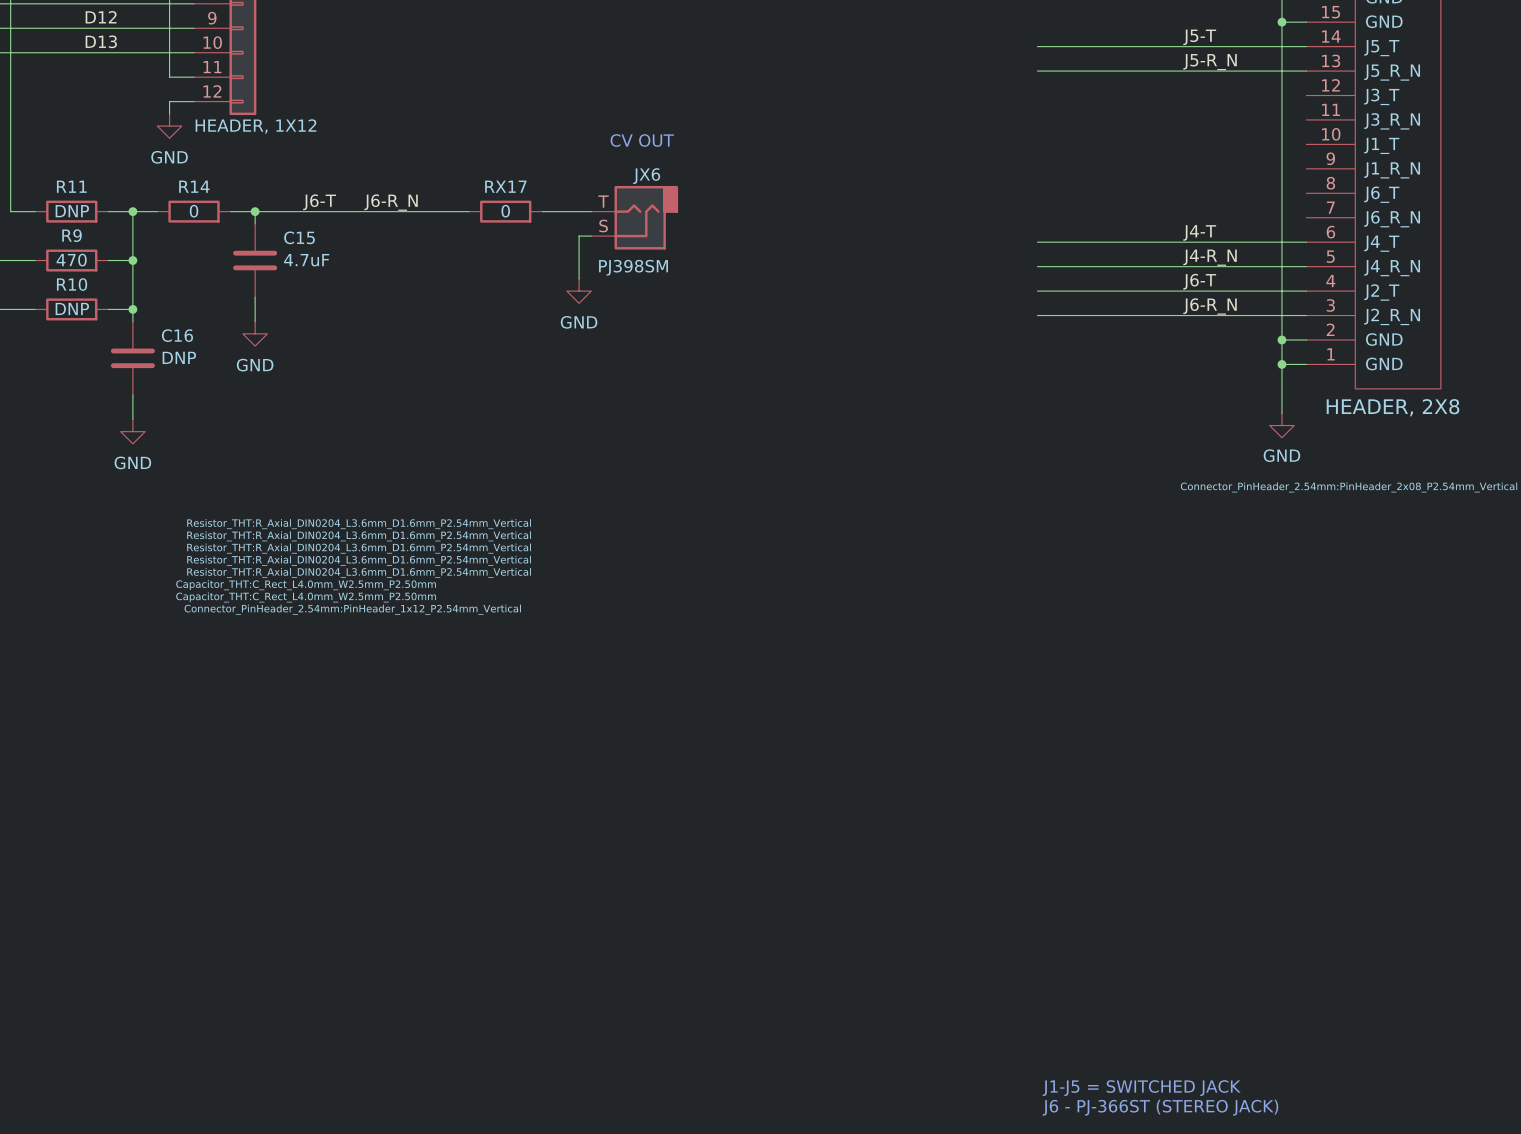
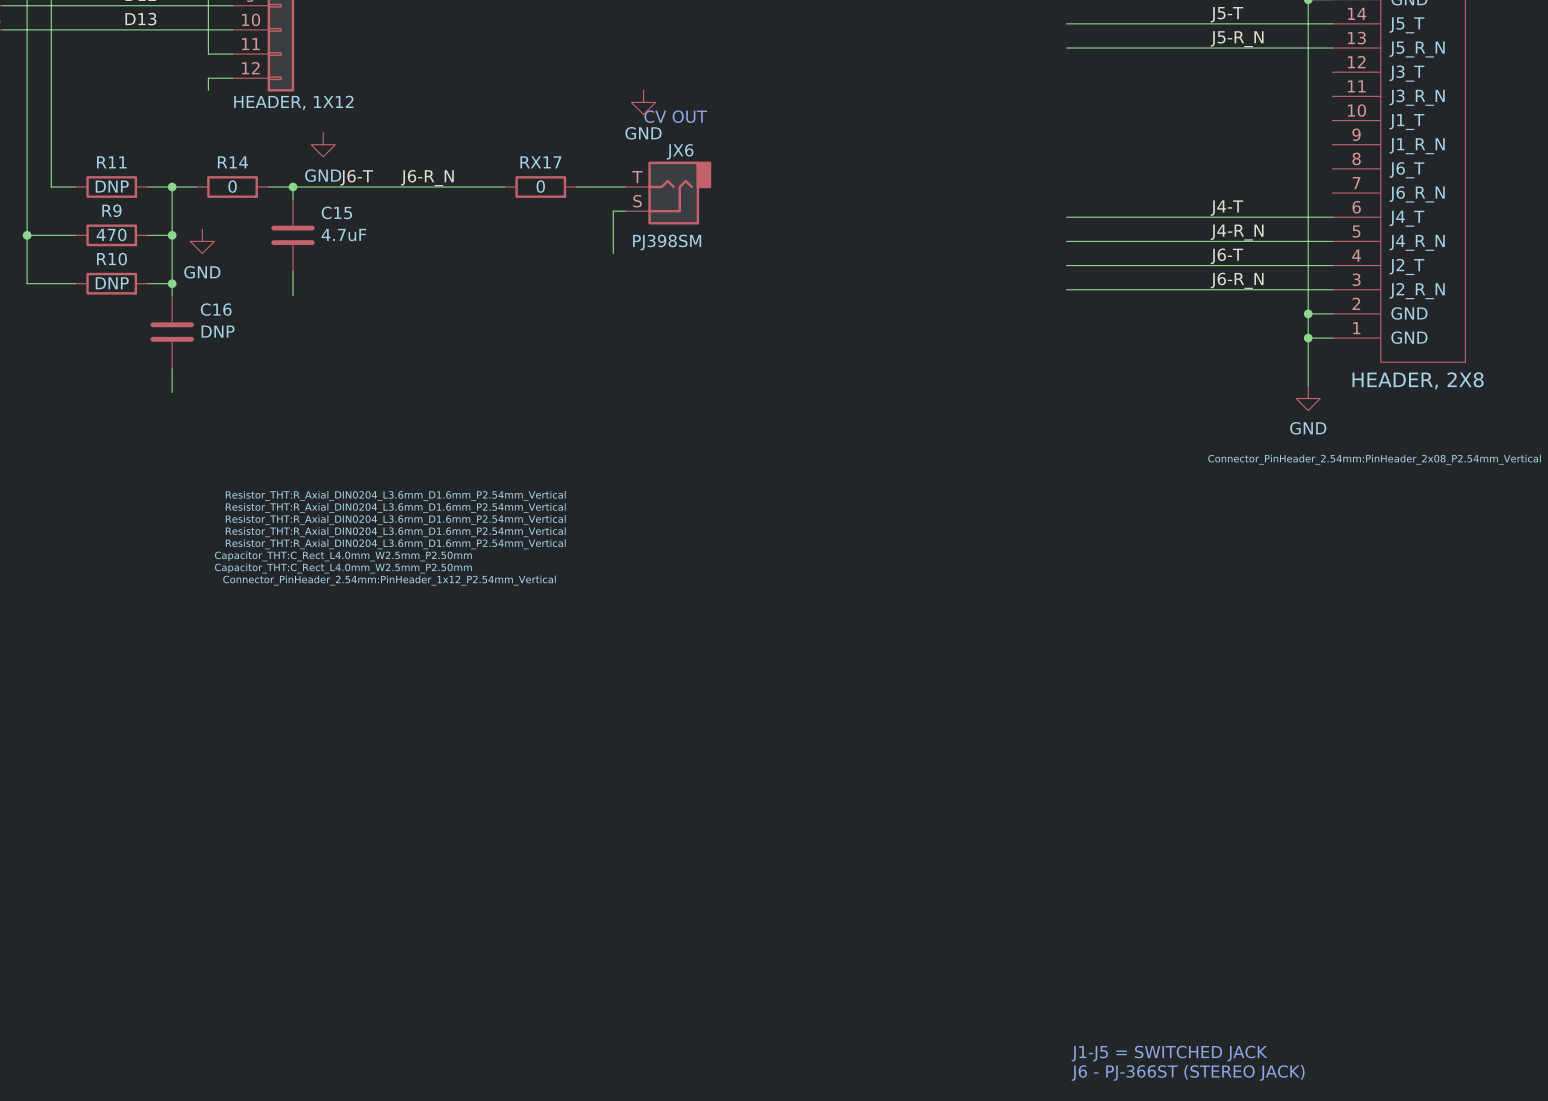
power symbol: GND (169, 126) -> none
power symbol: none -> GND (643, 102)
power symbol: none -> GND (323, 144)
power symbol: none -> GND (202, 241)
power symbol: GND (579, 291) -> none
power symbol: GND (255, 333) -> none
power symbol: GND (132, 431) -> none

